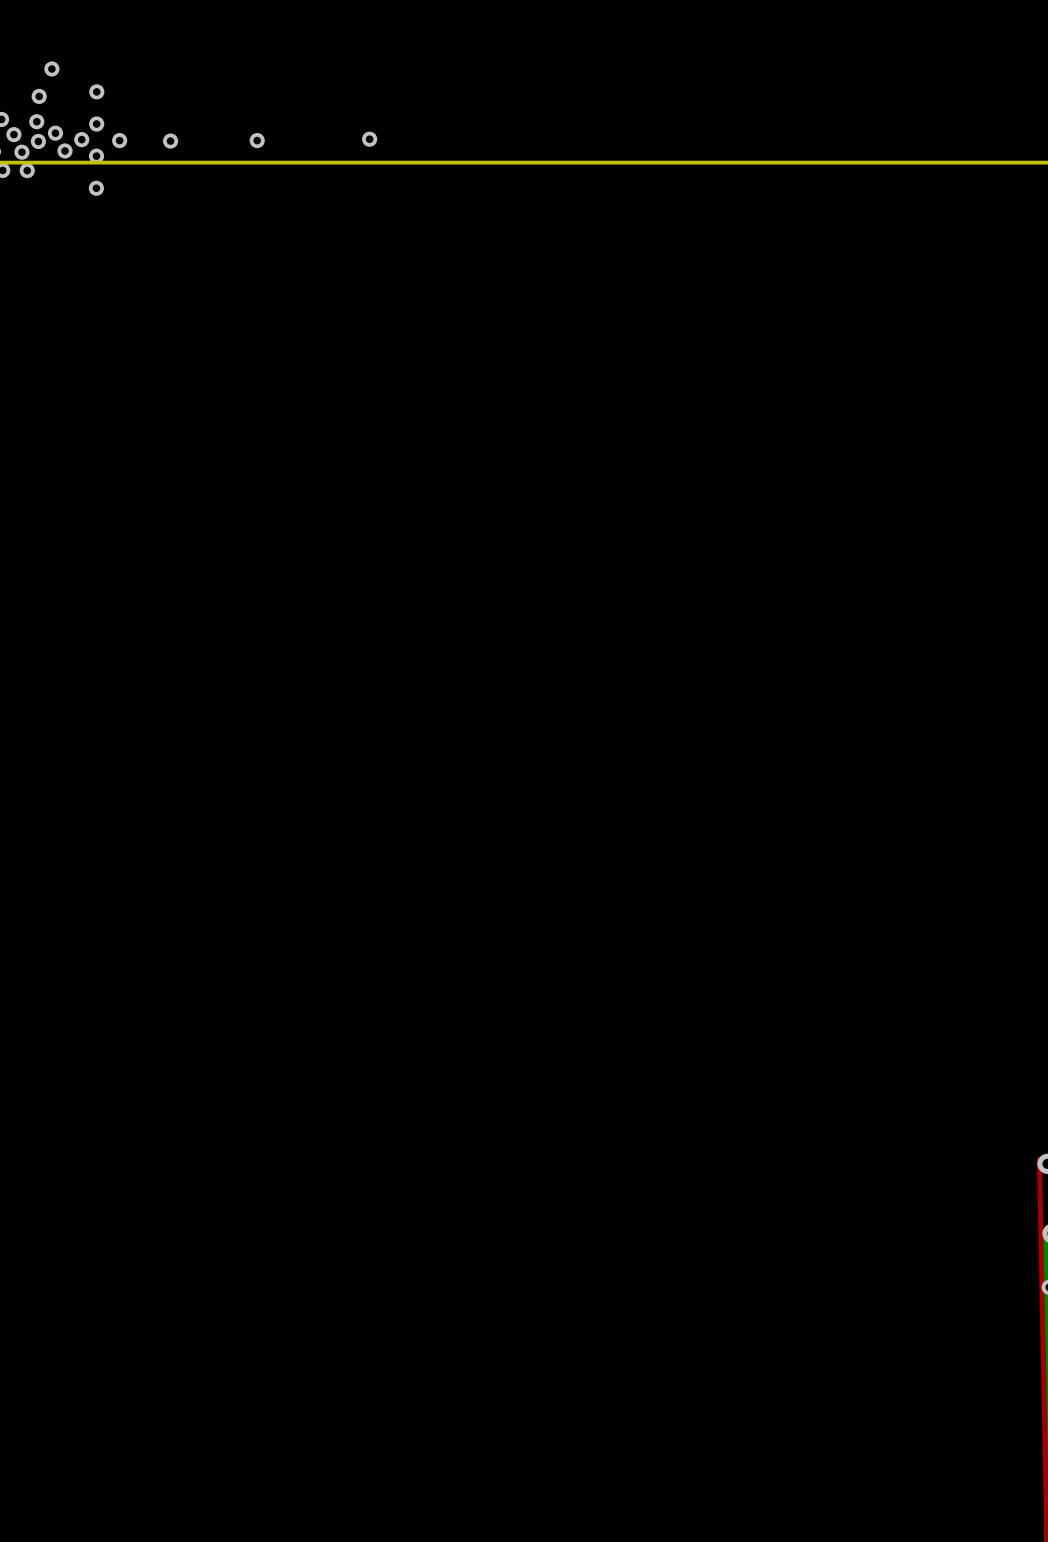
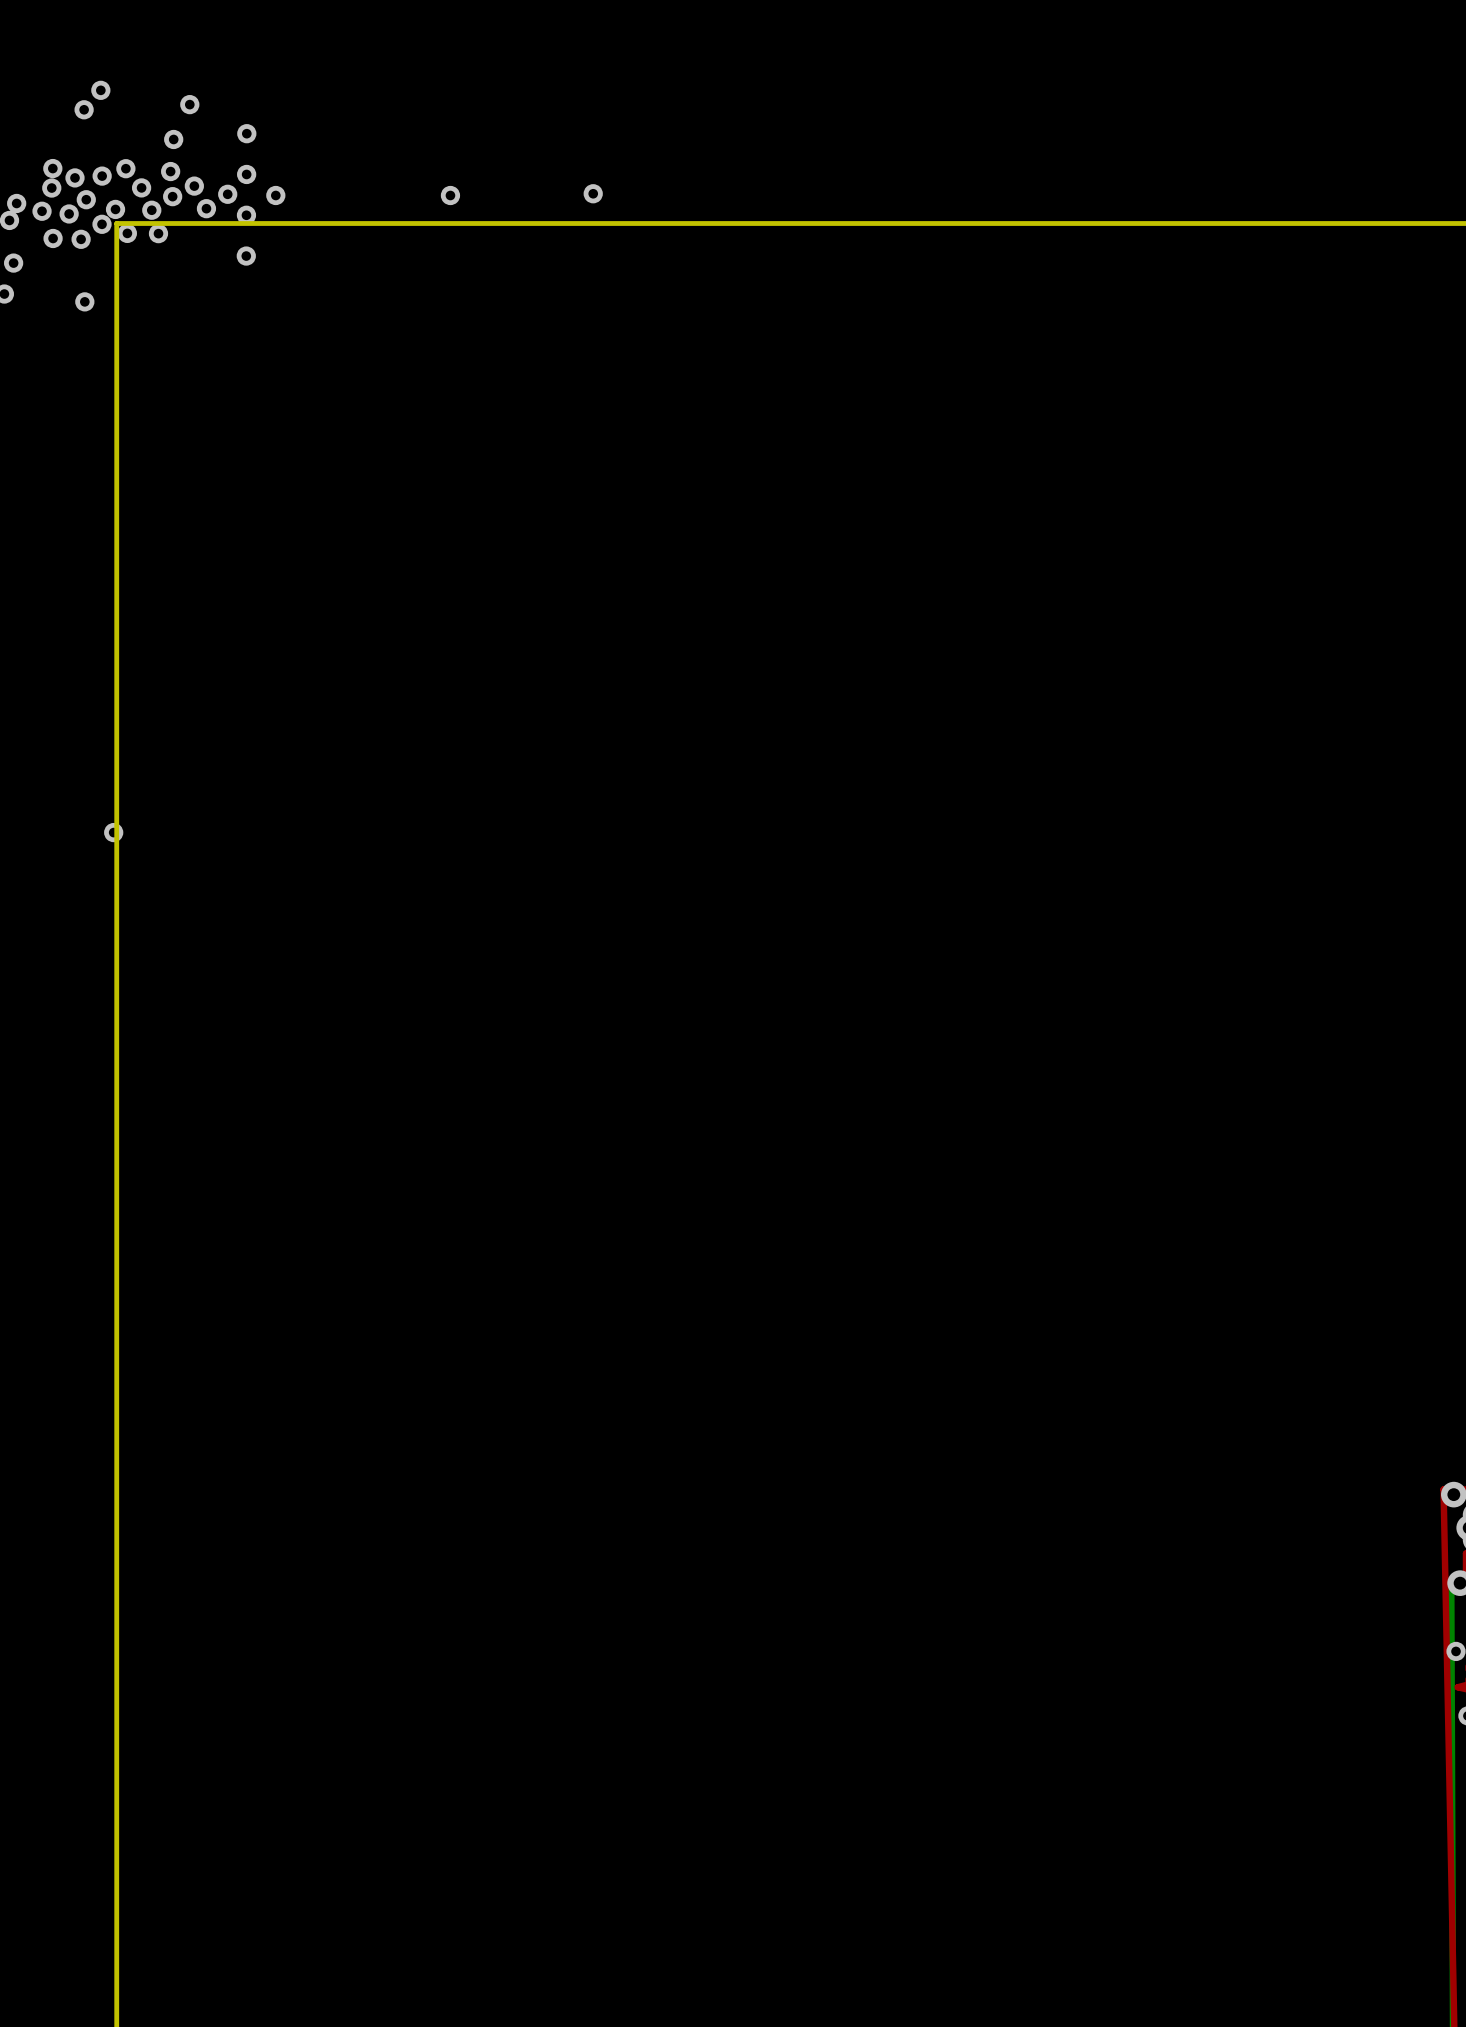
via: (170, 141) -> none

